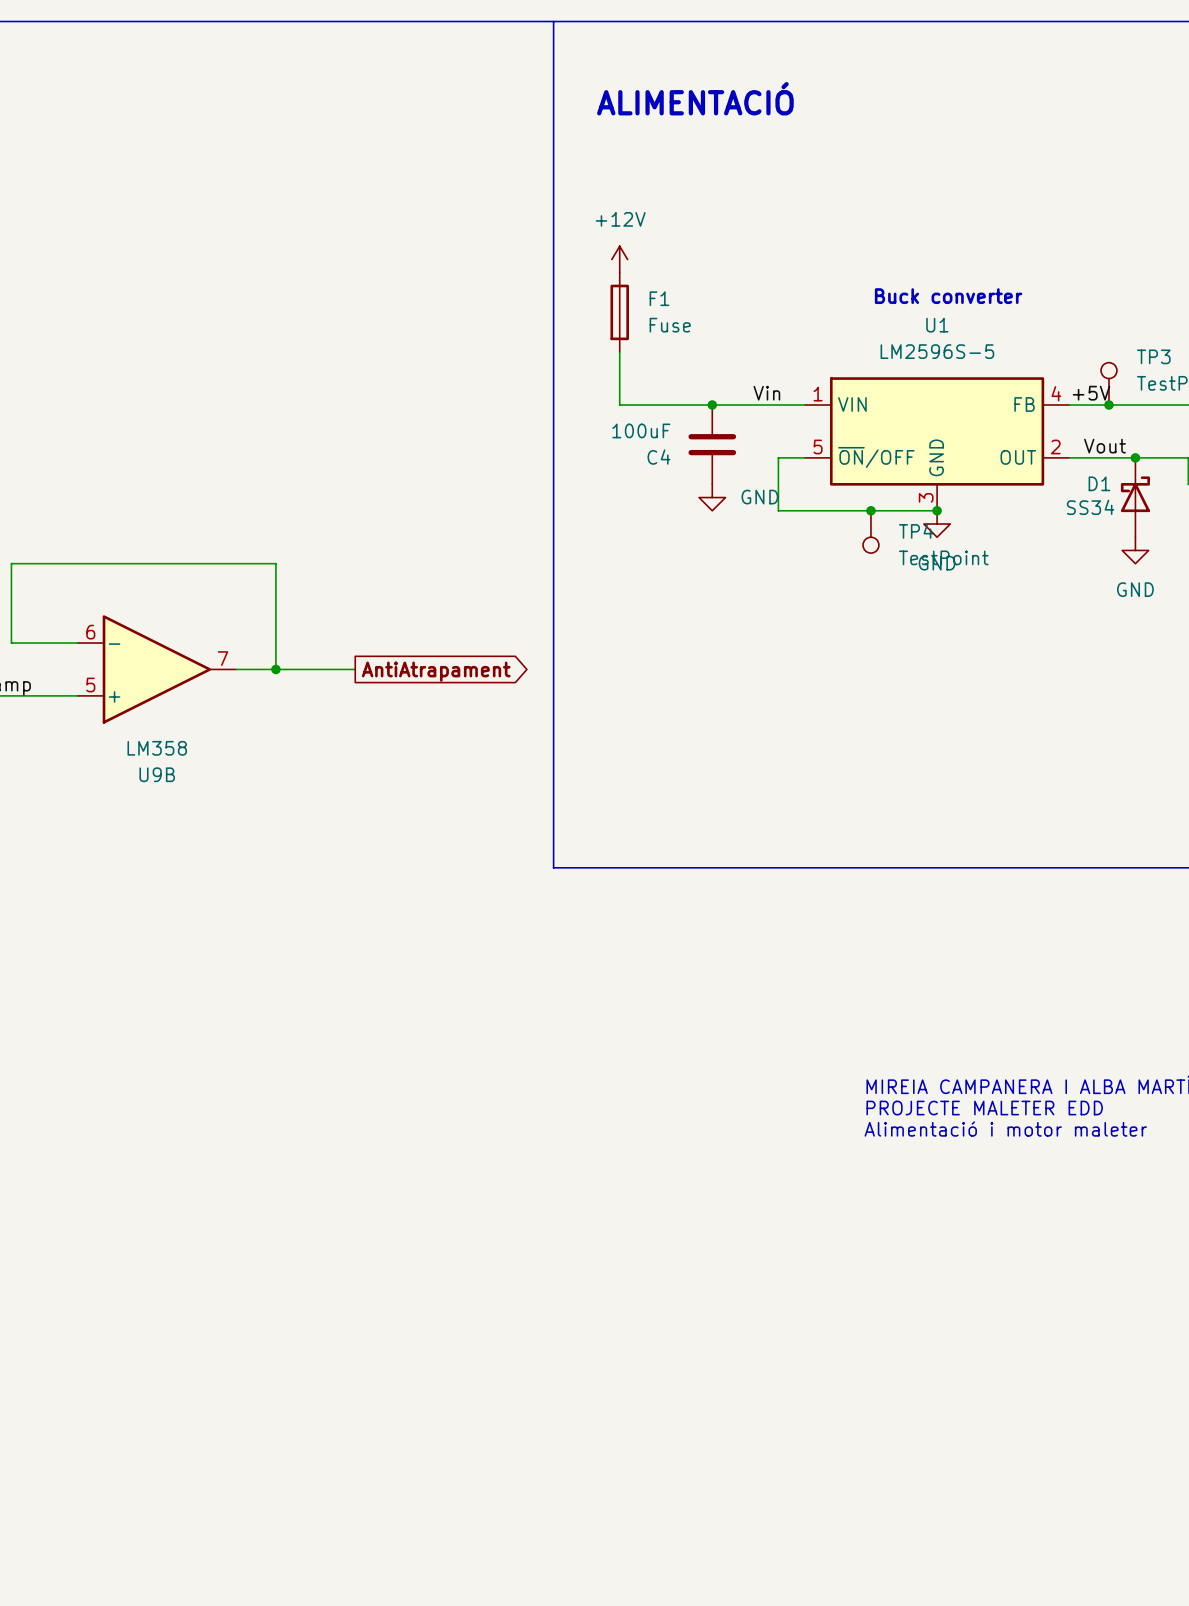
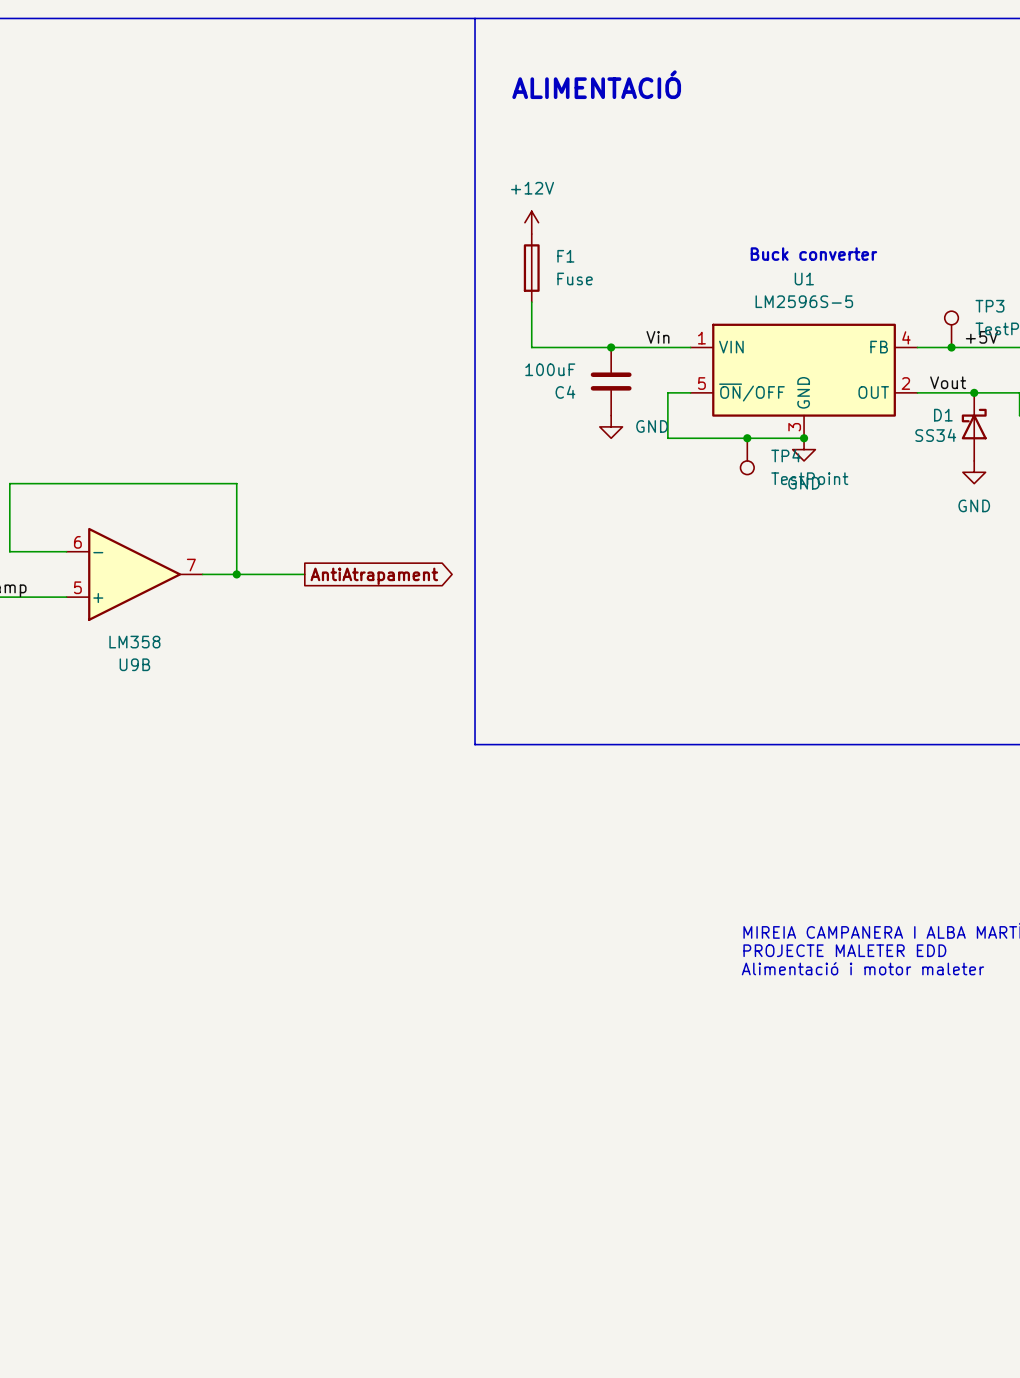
label position: +5V (1091, 393) -> +5V (981, 337)

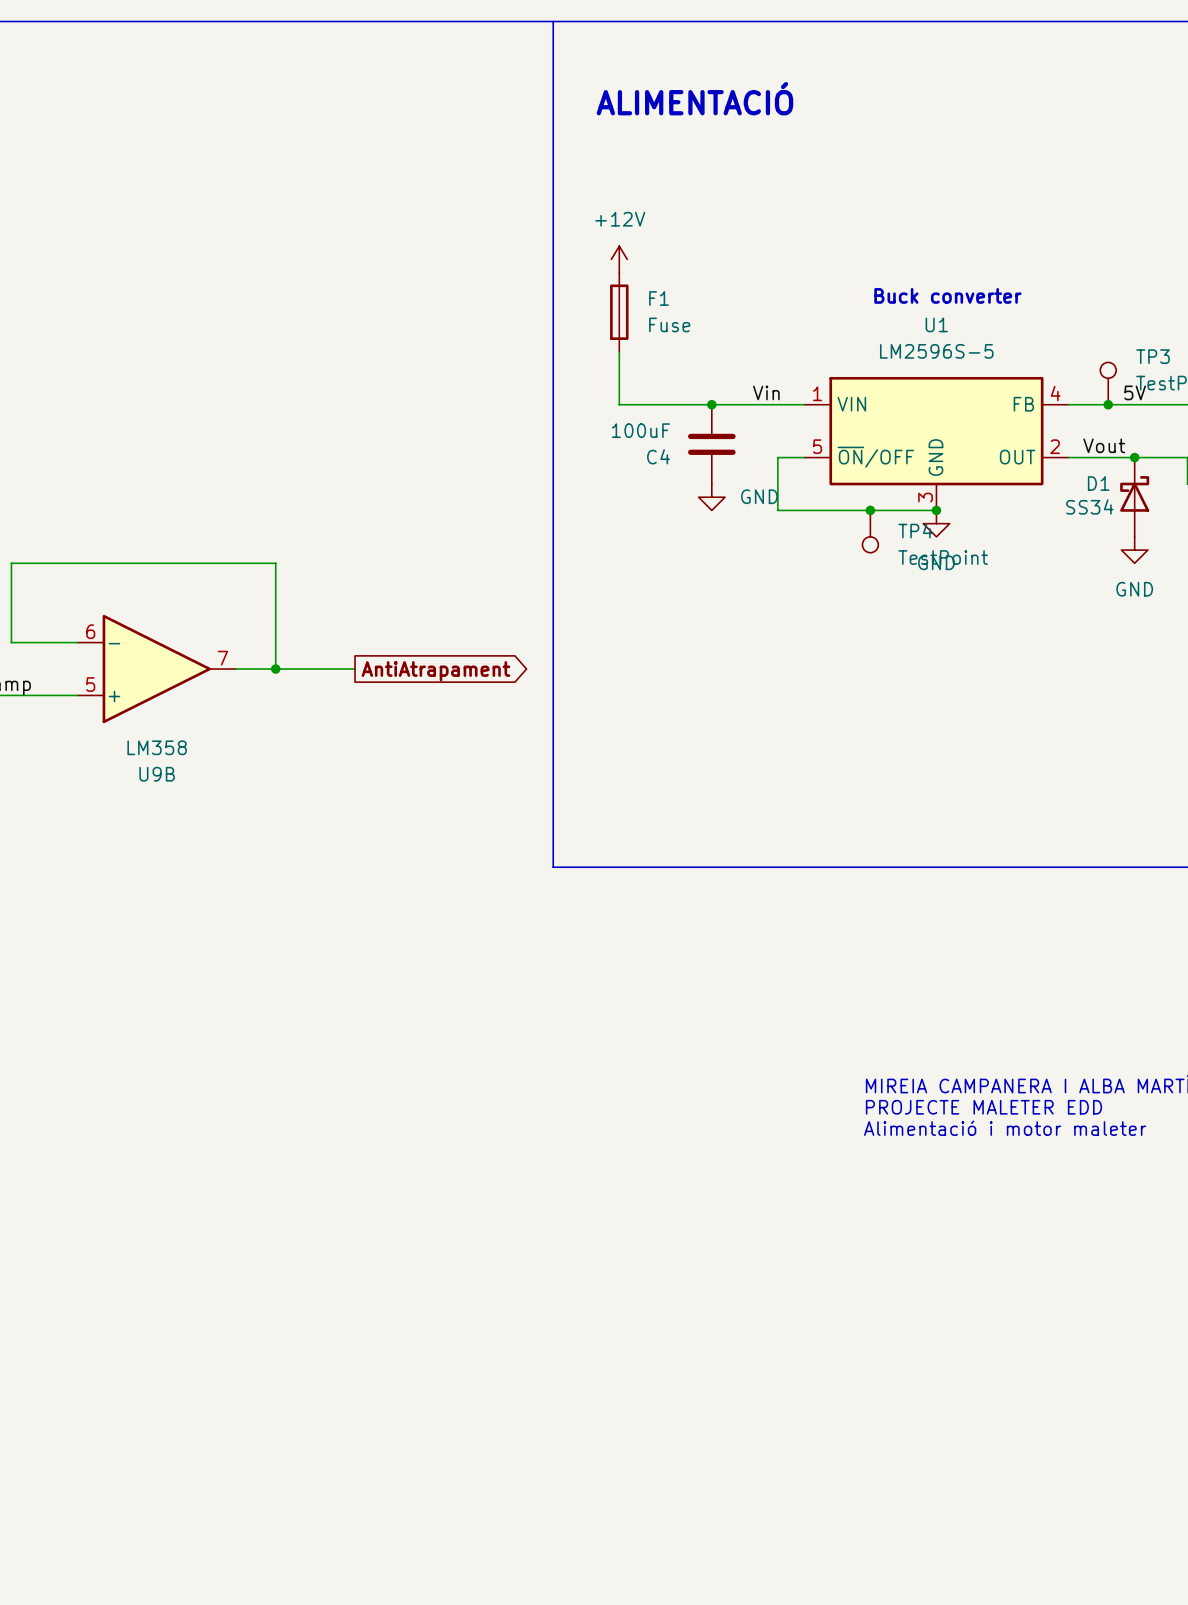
label: +5V (981, 337) -> 5V (1135, 392)

